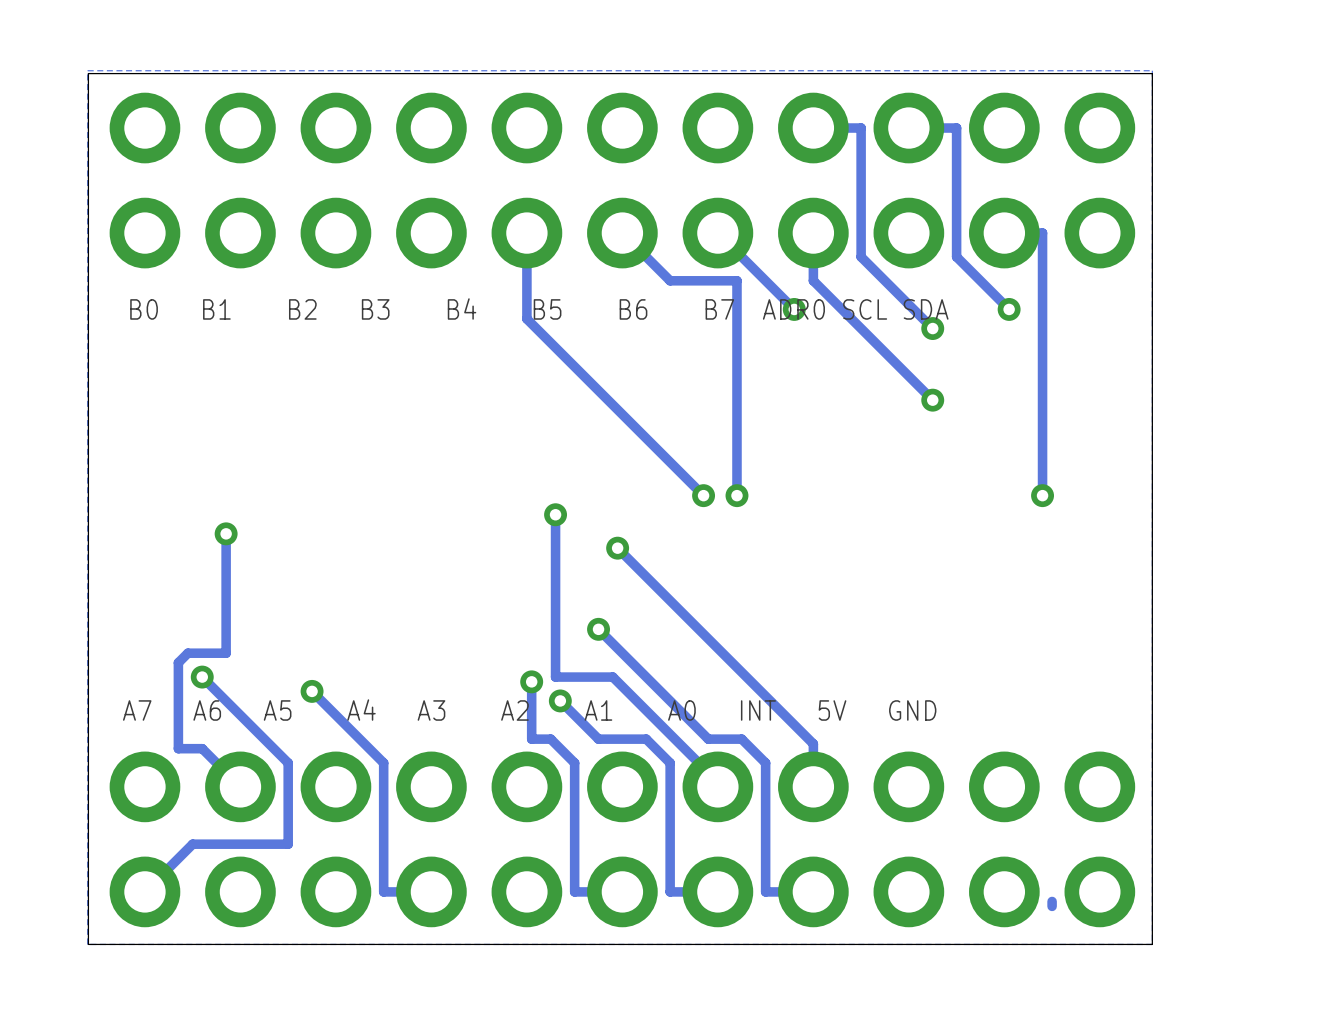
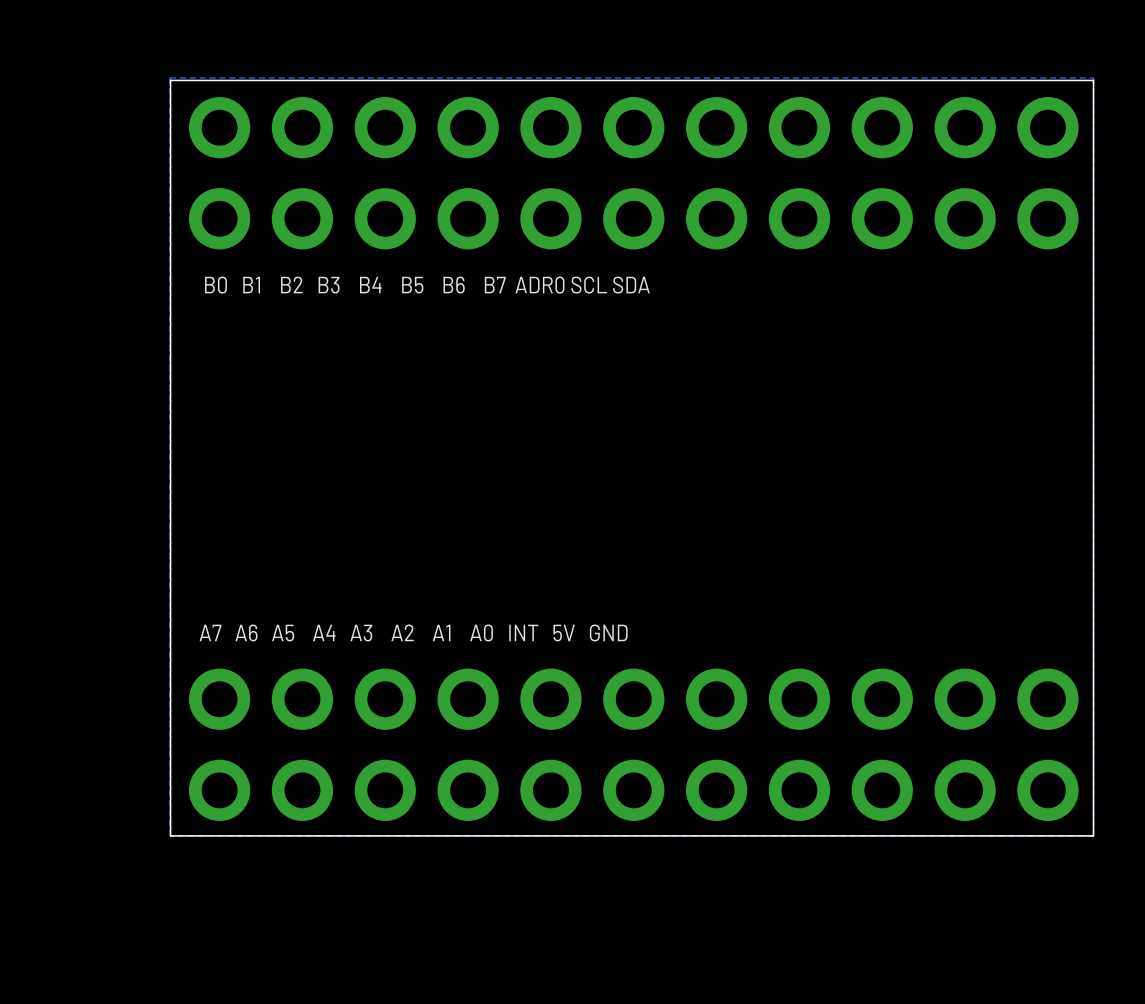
track: (813, 128) (861, 128) (861, 256) (932, 328) -> none
track: (908, 128) (956, 128) (956, 256) (1009, 309) -> none
track: (526, 233) (526, 318) (703, 495) -> none
track: (622, 233) (670, 280) (736, 280) (736, 495) -> none
track: (717, 233) (794, 309) -> none
track: (813, 233) (813, 280) (932, 400) -> none
track: (1004, 233) (1042, 233) (1042, 495) -> none
via: (794, 309) -> none
via: (1009, 309) -> none
via: (932, 328) -> none
via: (932, 400) -> none
via: (703, 495) -> none
via: (736, 495) -> none
via: (1042, 495) -> none
track: (555, 514) (555, 677) (612, 677) (717, 782) (717, 786) -> none
via: (555, 514) -> none
track: (226, 533) (226, 653) (187, 653) (178, 662) (178, 748) (202, 748) (240, 786) -> none
via: (226, 533) -> none
track: (617, 548) (813, 743) (813, 786) -> none
via: (617, 548) -> none
track: (598, 629) (708, 739) (741, 739) (765, 763) (765, 891) (813, 891) -> none
via: (598, 629) -> none
track: (202, 677) (288, 763) (288, 844) (192, 844) (144, 891) -> none
via: (202, 677) -> none
track: (531, 681) (531, 739) (550, 739) (574, 763) (574, 891) (622, 891) -> none
via: (531, 681) -> none
track: (312, 691) (383, 763) (383, 891) (431, 891) -> none
via: (312, 691) -> none
track: (560, 700) (598, 739) (646, 739) (670, 763) (670, 891) (717, 891) -> none
via: (560, 700) -> none
track: (1052, 901) (1052, 906) -> none

